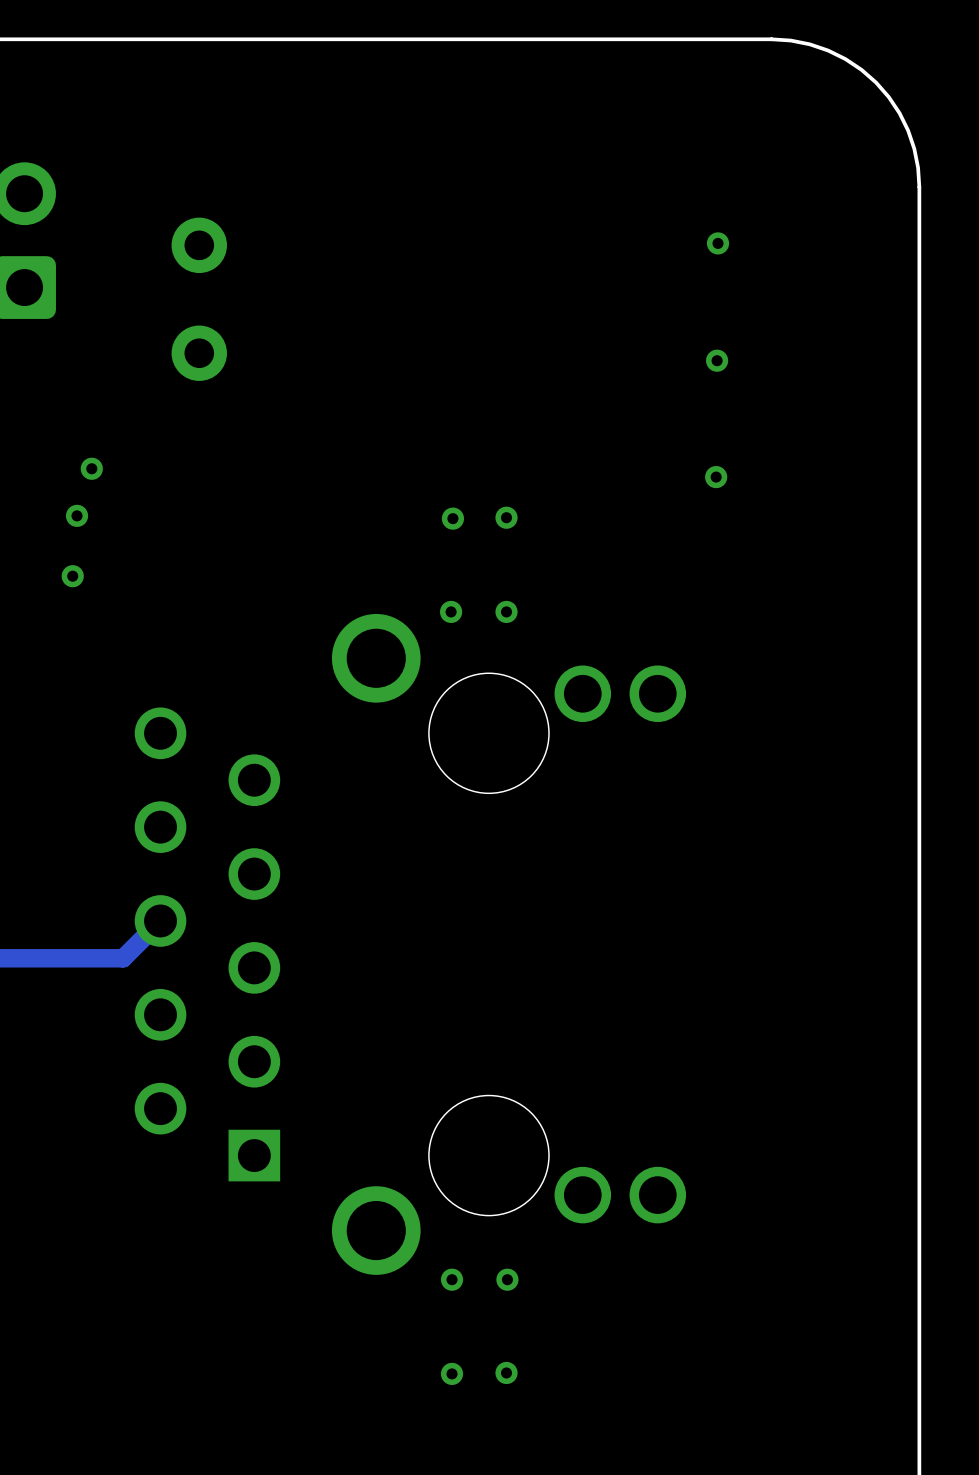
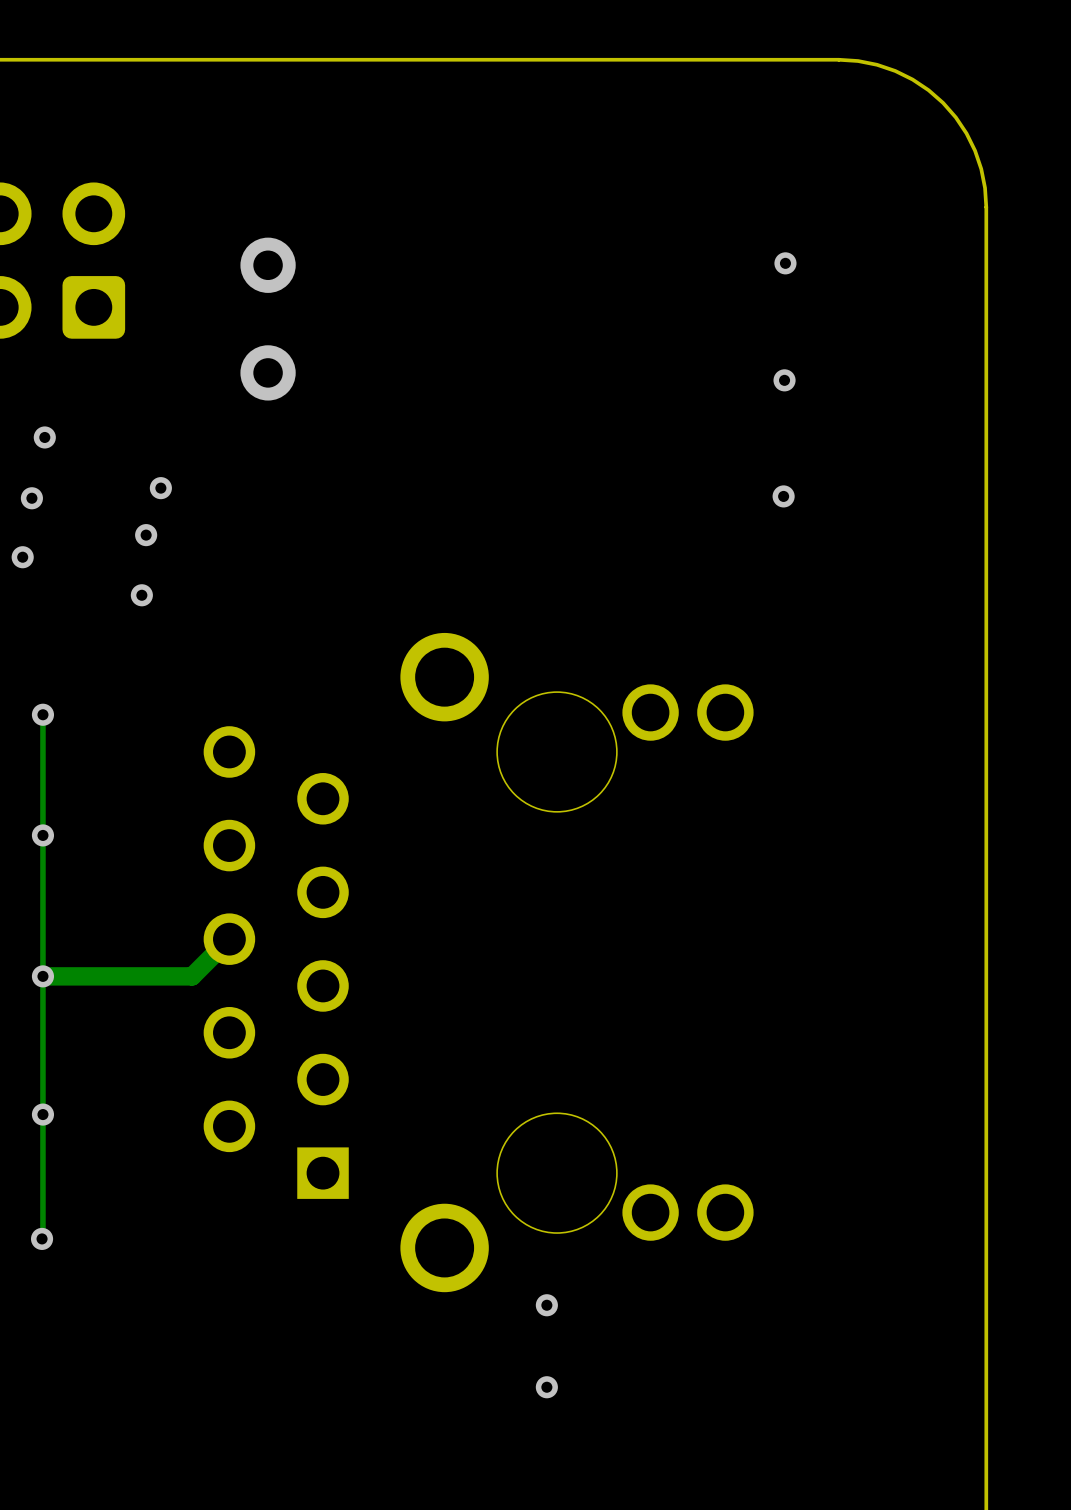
via: (506, 517) -> none
via: (452, 518) -> none
via: (451, 611) -> none
via: (506, 611) -> none
via: (452, 1279) -> none
via: (507, 1279) -> none
via: none -> (546, 1305)
via: none -> (546, 1387)
via: (506, 1372) -> none
via: (452, 1373) -> none

